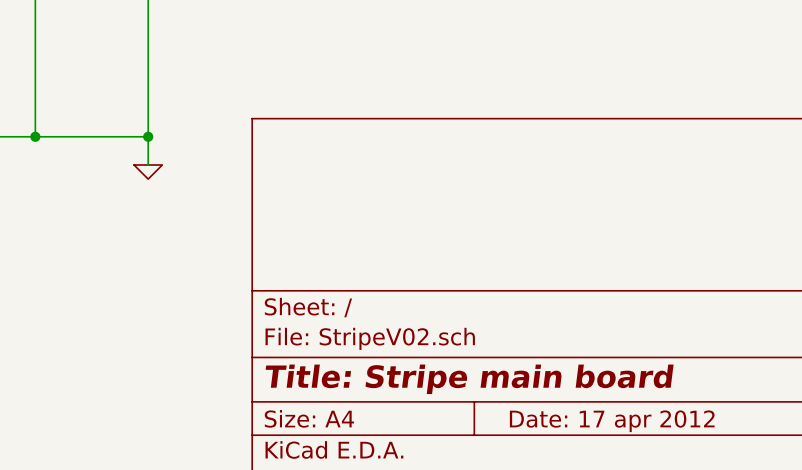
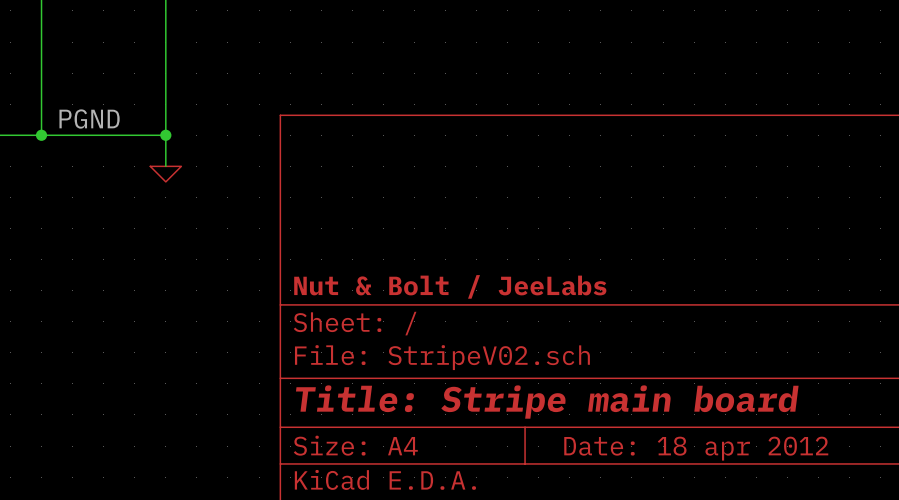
label: none -> PGND (89, 119)
title block: none -> Nut & Bolt / JeeLabs (450, 286)
title block: Date: 17 apr 2012 (612, 421) -> Date: 18 apr 2012 (696, 448)

